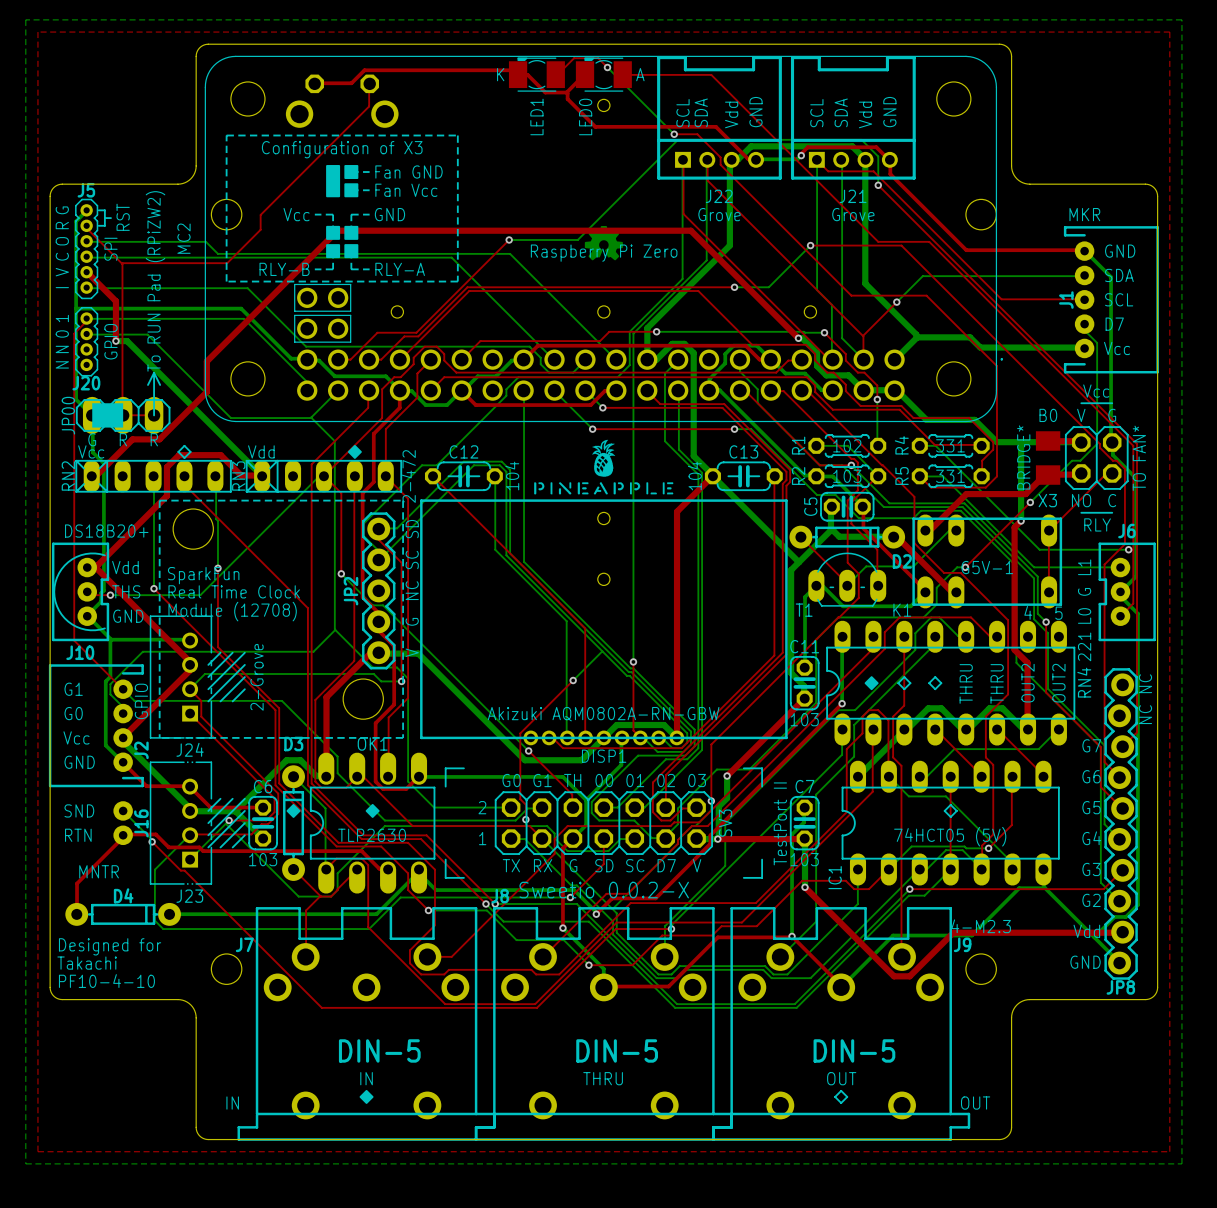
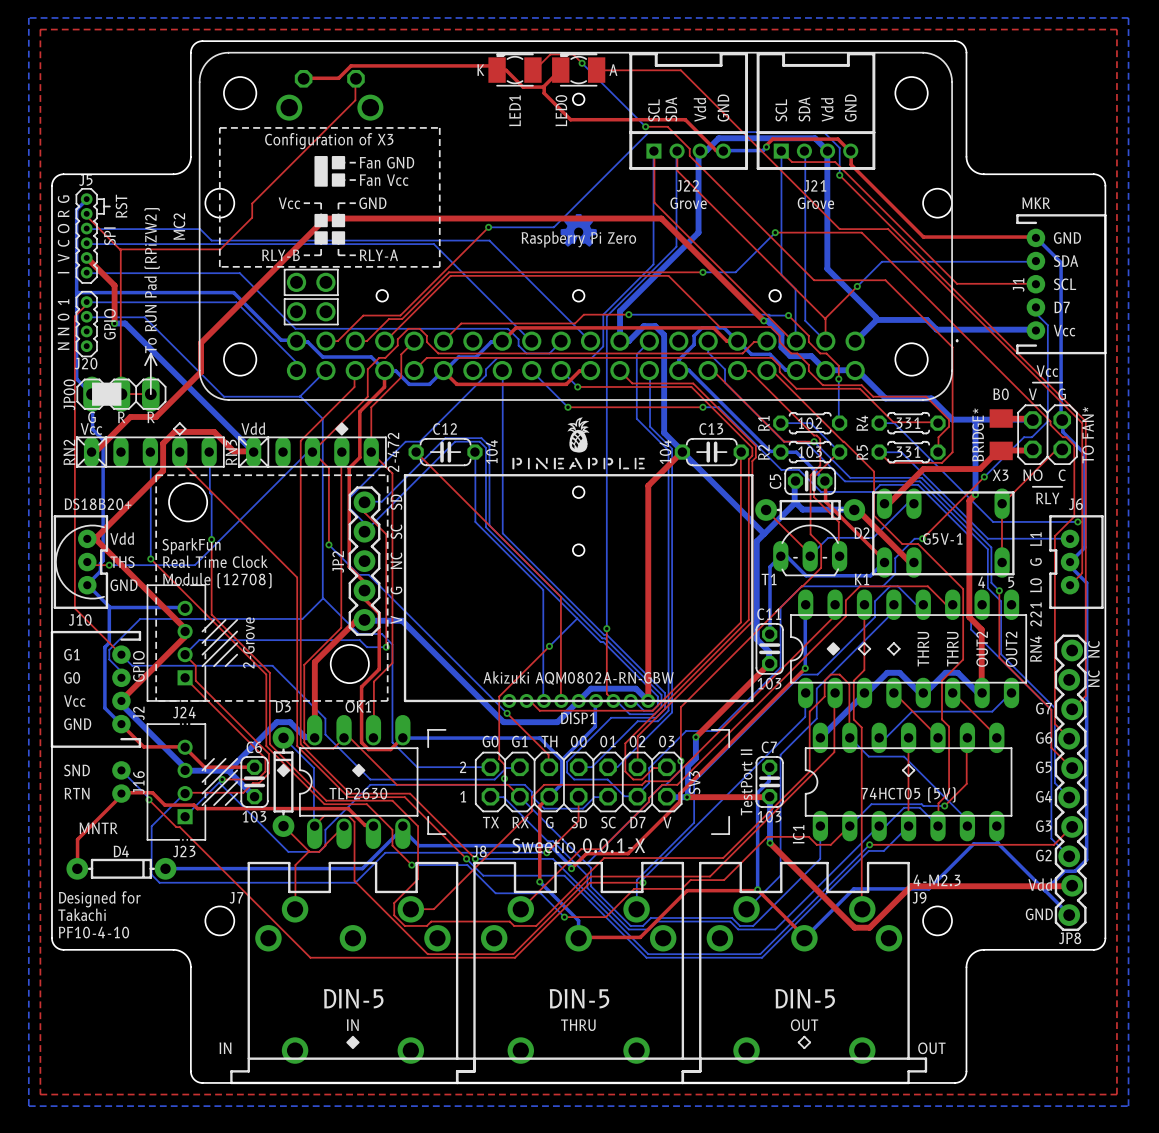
text: Sweetio 0.0.2-X (604, 890) -> Sweetio 0.0.1-X (578, 845)

